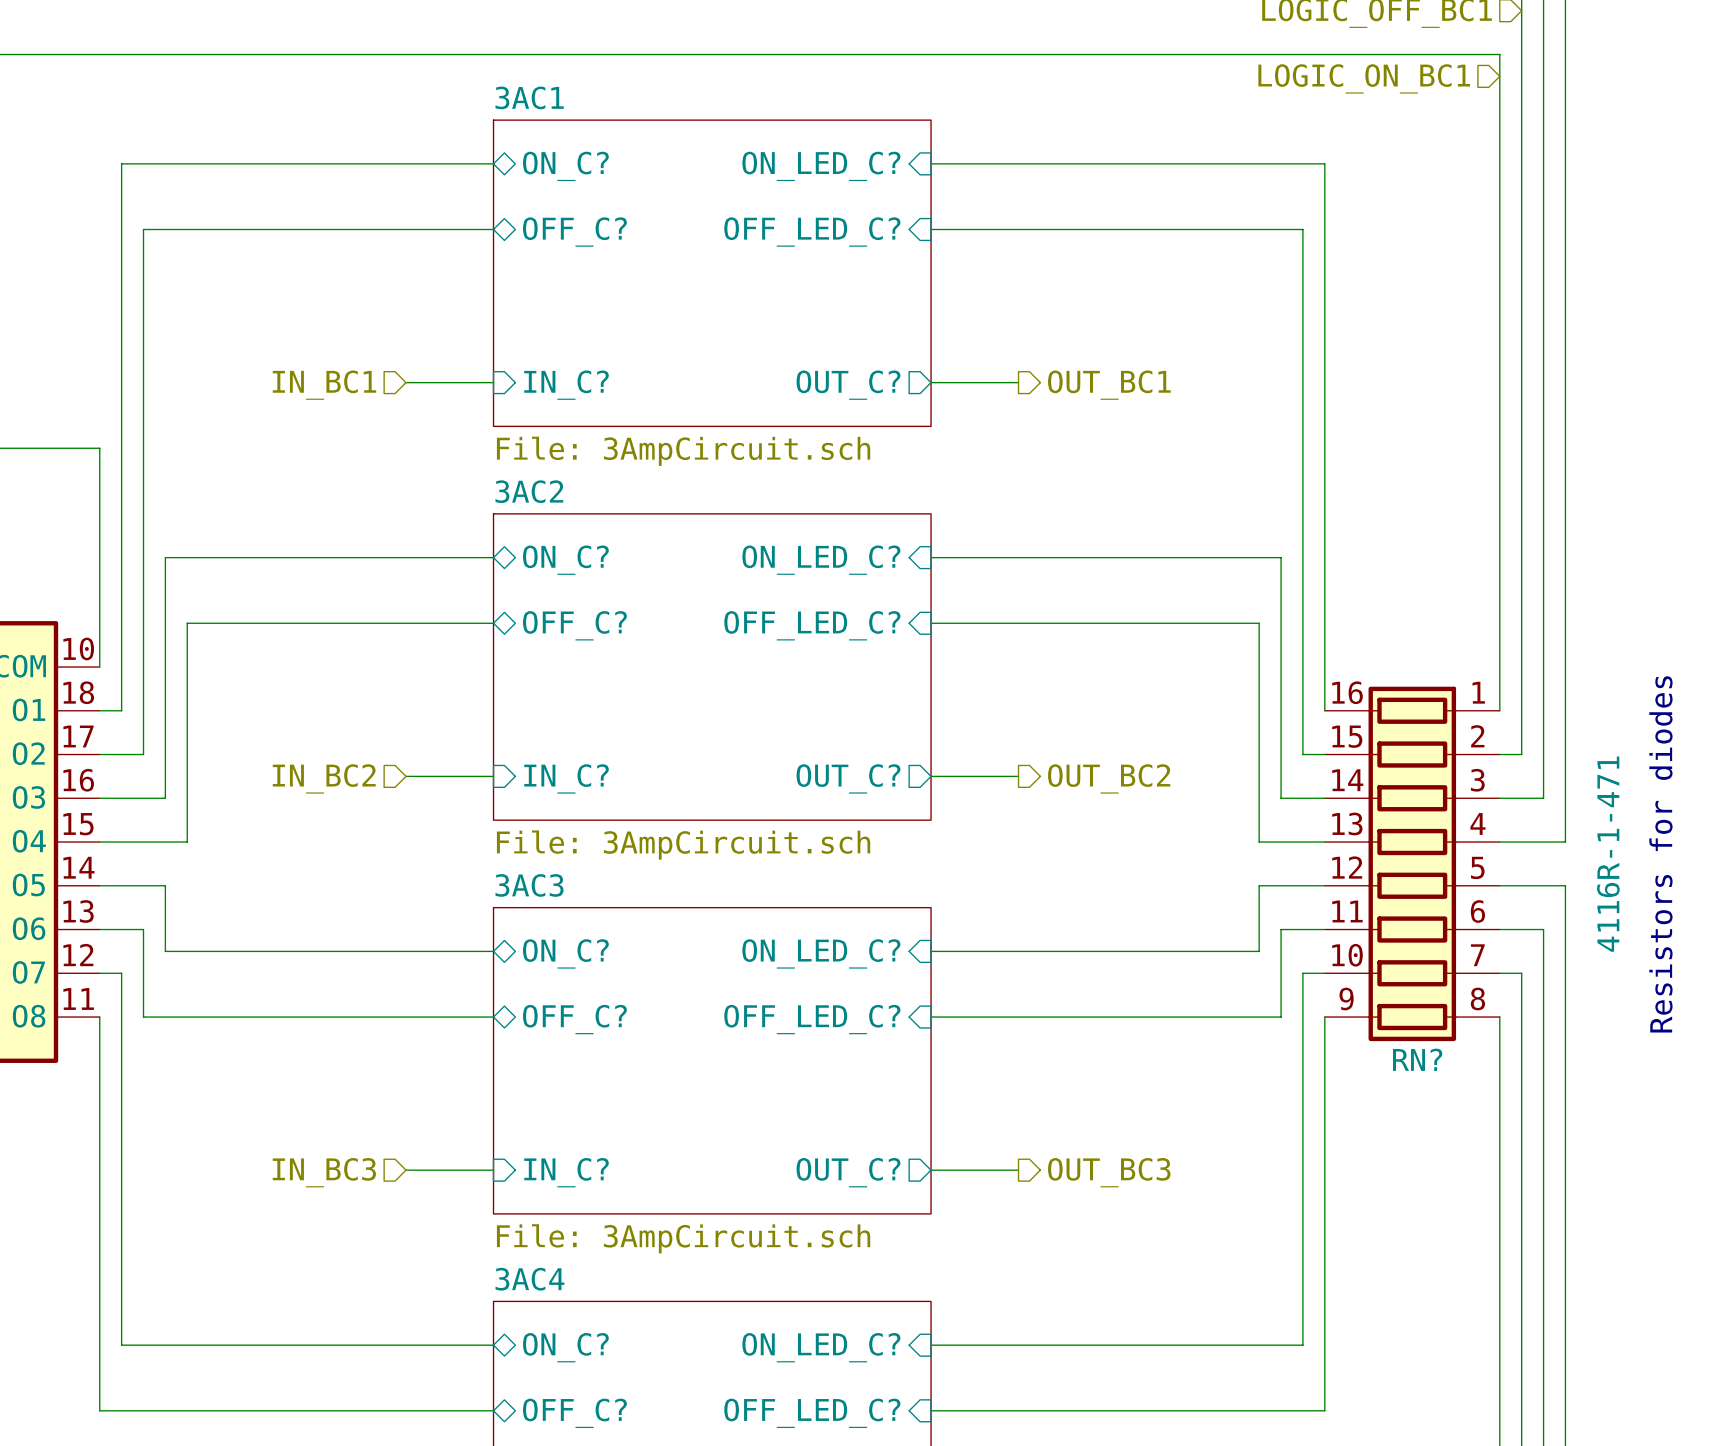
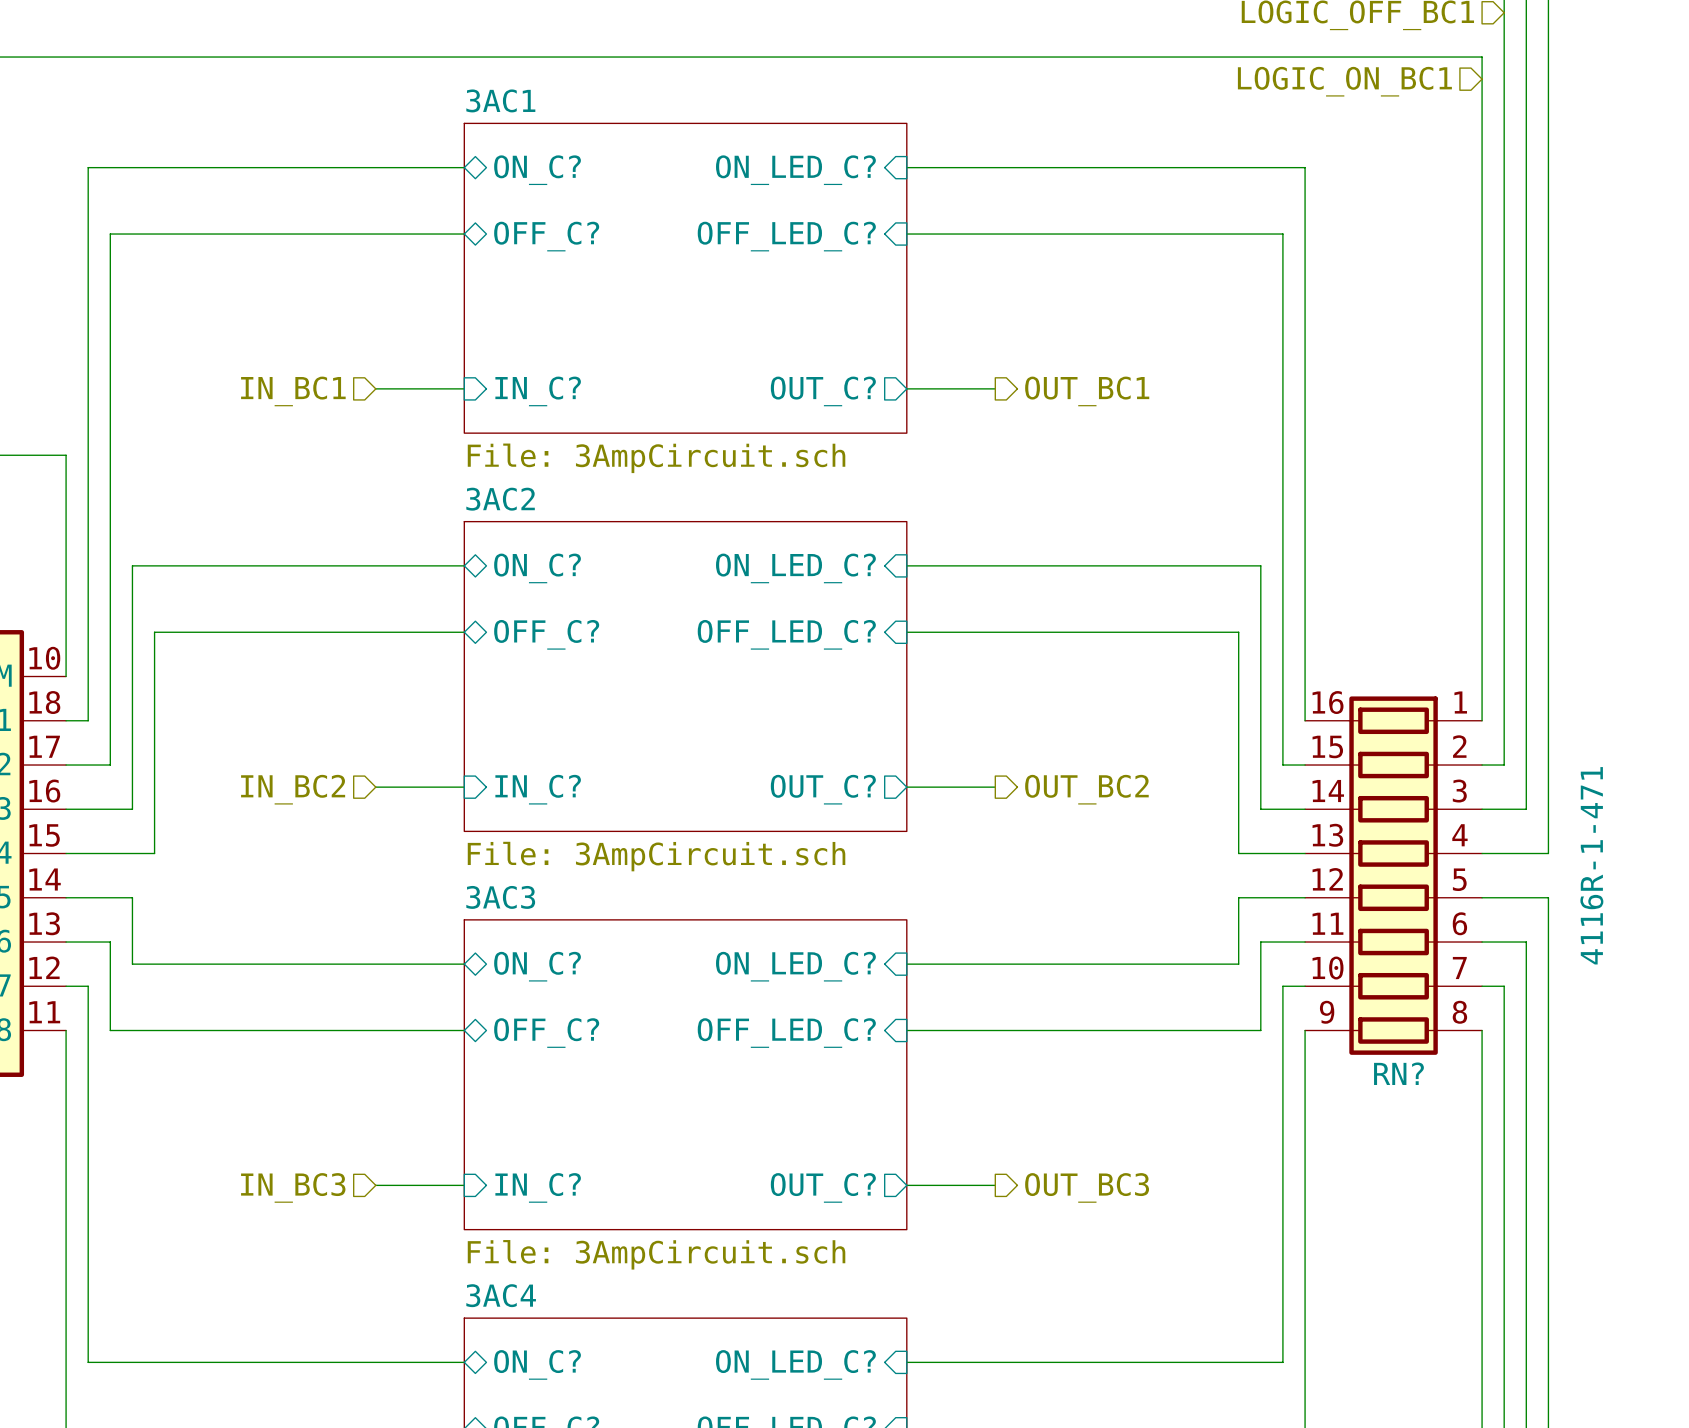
text: Resistors for diodes (1660, 854) -> none

